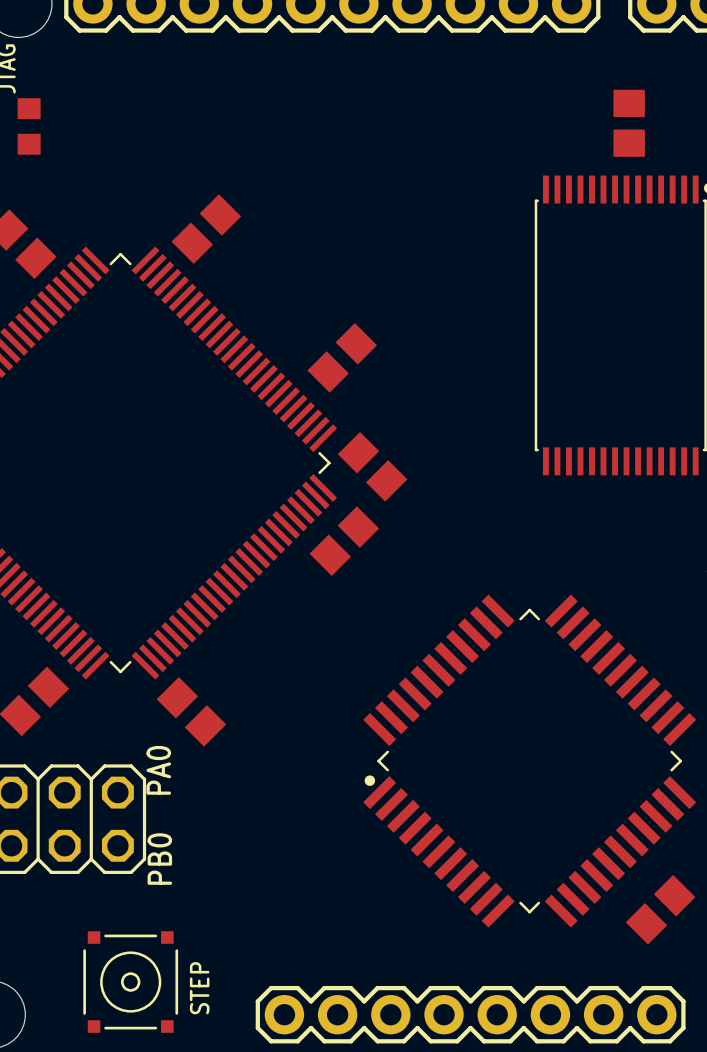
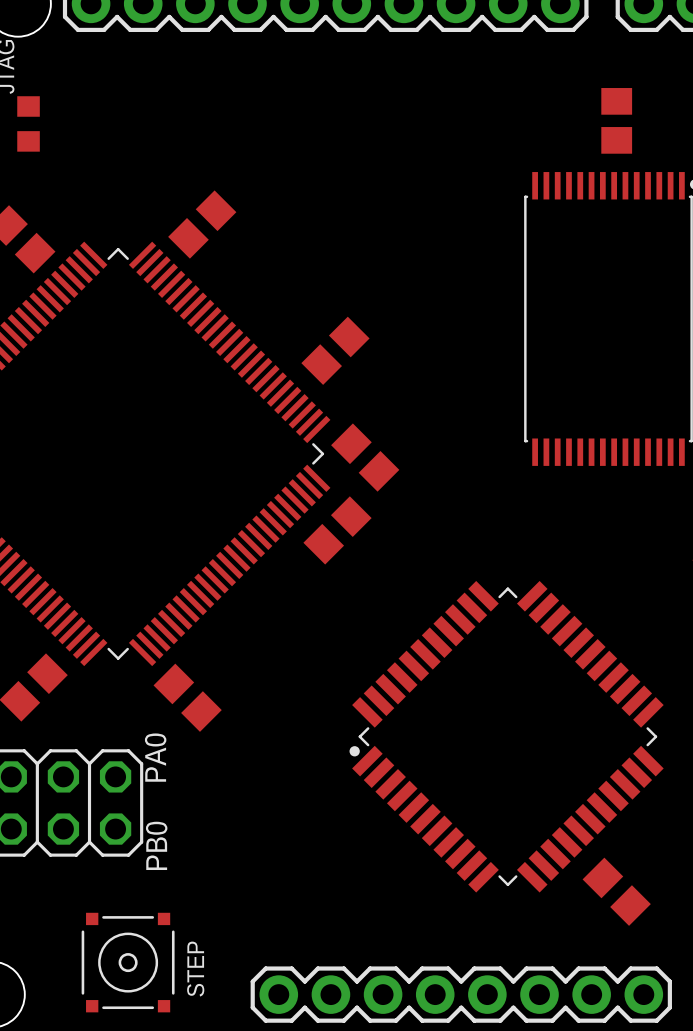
part footprint: [363, 594, 697, 928] -> [349, 580, 664, 893]
part rotation: 0° (660, 909) -> 90° clockwise (616, 891)

